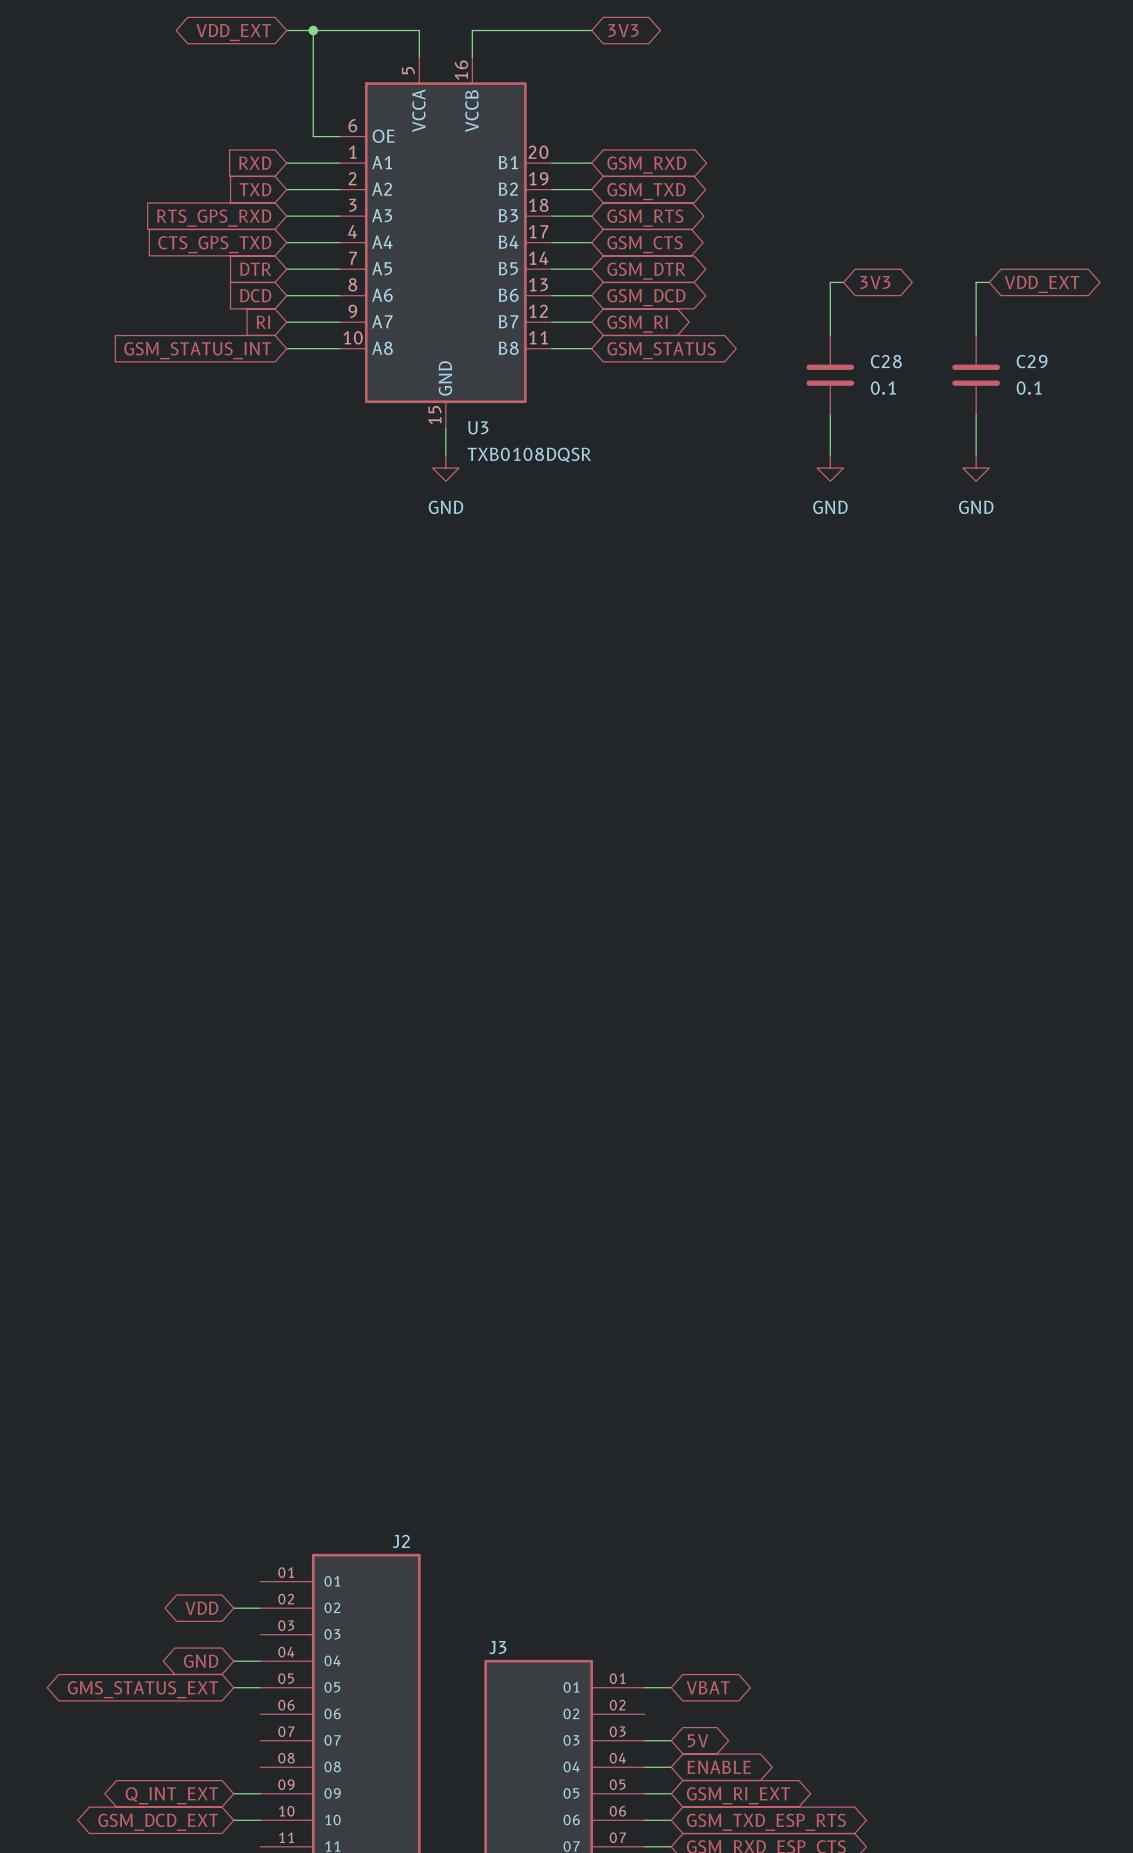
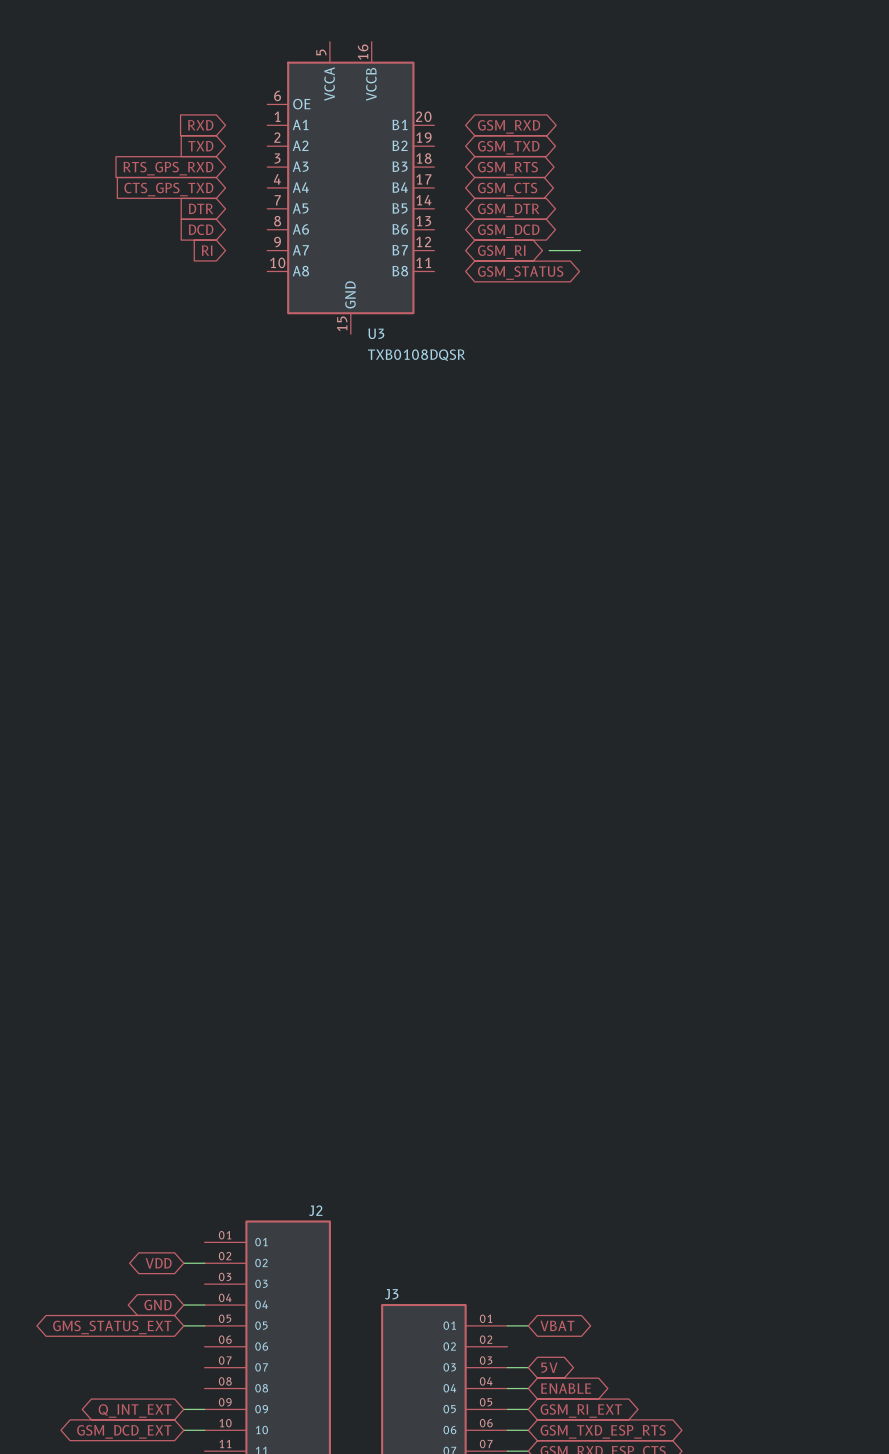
wire: (286, 30) (419, 30) (419, 57) -> none
wire: (313, 30) (313, 136) (339, 136) -> none
junction: (313, 30) -> none
wire: (591, 30) (472, 30) (472, 57) -> none
global label: 3V3 (623, 30) -> none
global label: VDD_EXT (233, 32) -> none
wire: (286, 163) (339, 163) -> none
wire: (551, 163) (591, 163) -> none
wire: (286, 189) (339, 189) -> none
wire: (551, 189) (591, 189) -> none
wire: (286, 216) (339, 216) -> none
wire: (551, 216) (591, 216) -> none
wire: (286, 242) (339, 242) -> none
wire: (551, 242) (591, 242) -> none
wire: (286, 269) (339, 269) -> none
wire: (551, 269) (591, 269) -> none
wire: (843, 282) (830, 282) (830, 335) -> none
global label: 3V3 (875, 282) -> none
wire: (989, 282) (976, 282) (976, 335) -> none
global label: VDD_EXT (1042, 284) -> none
wire: (286, 295) (339, 295) -> none
wire: (551, 295) (591, 295) -> none
wire: (286, 322) (339, 322) -> none
wire: (551, 322) (591, 322) -> (549, 250) (580, 250)
wire: (286, 348) (339, 348) -> none
wire: (551, 348) (591, 348) -> none
global label: GSM_STATUS_INT (197, 350) -> none
C28: 0.1 (830, 375) -> none
C29: 0.1 (976, 375) -> none
wire: (830, 415) (830, 454) -> none
wire: (976, 415) (976, 454) -> none
wire: (445, 428) (445, 454) -> none
power symbol: GND (445, 468) -> none
power symbol: GND (830, 468) -> none
power symbol: GND (976, 468) -> none

